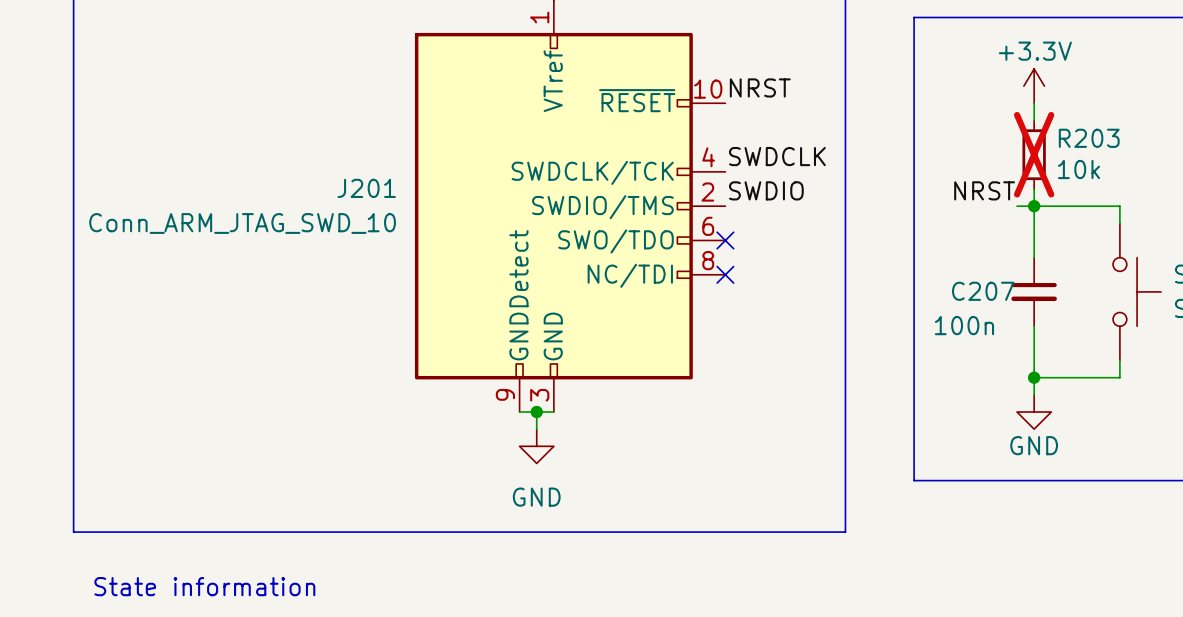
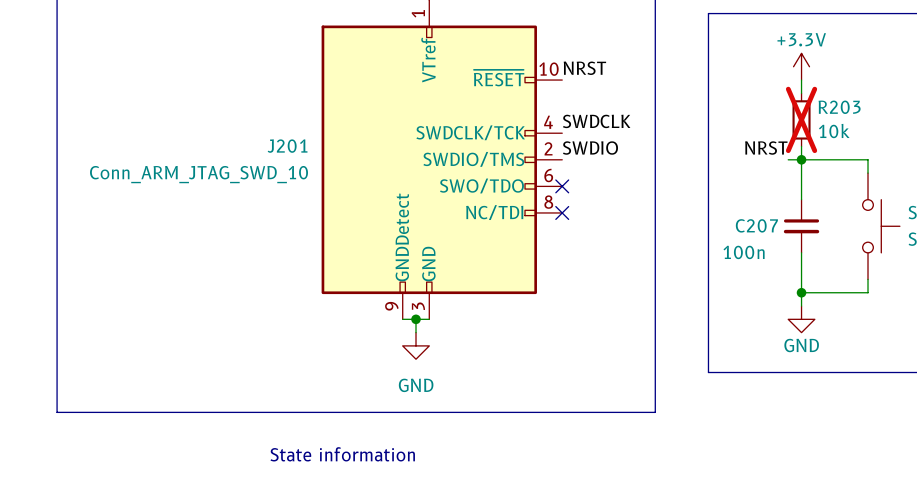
text position: State information (204, 586) -> State information (342, 454)

